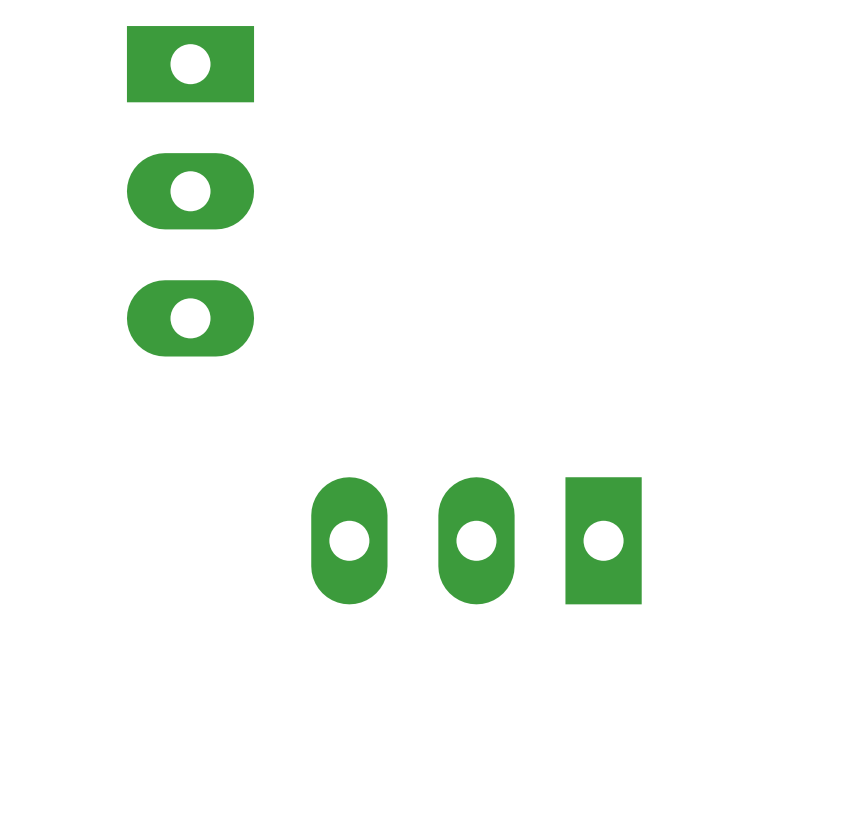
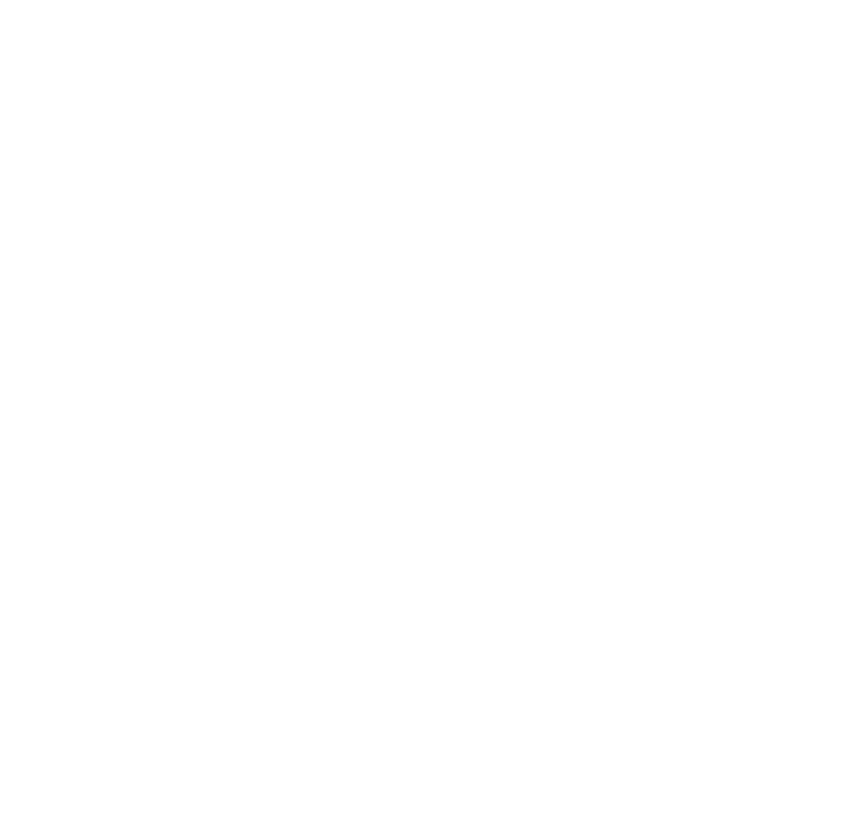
part: (190, 191) -> none
part: (476, 540) -> none

